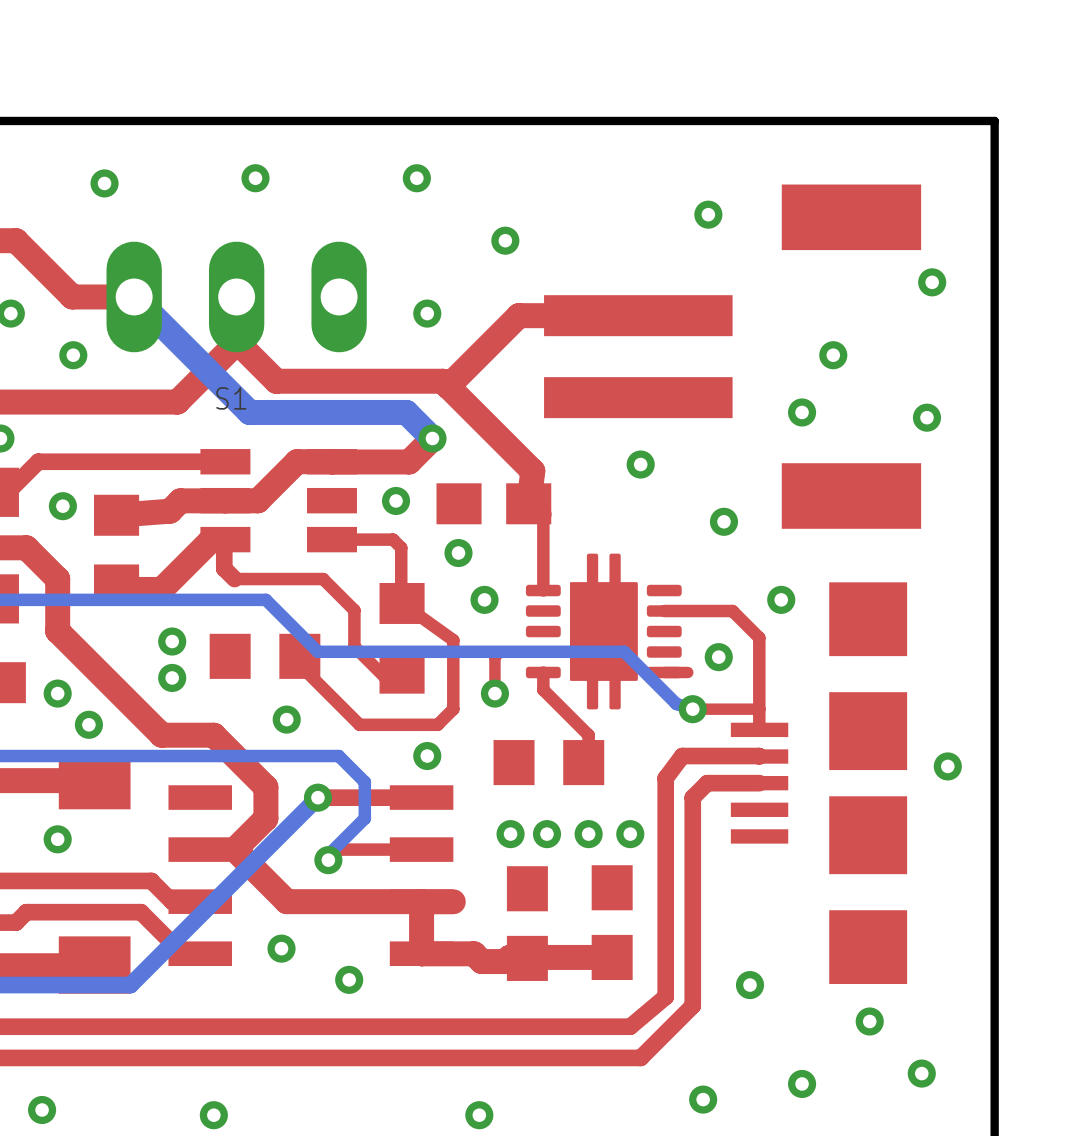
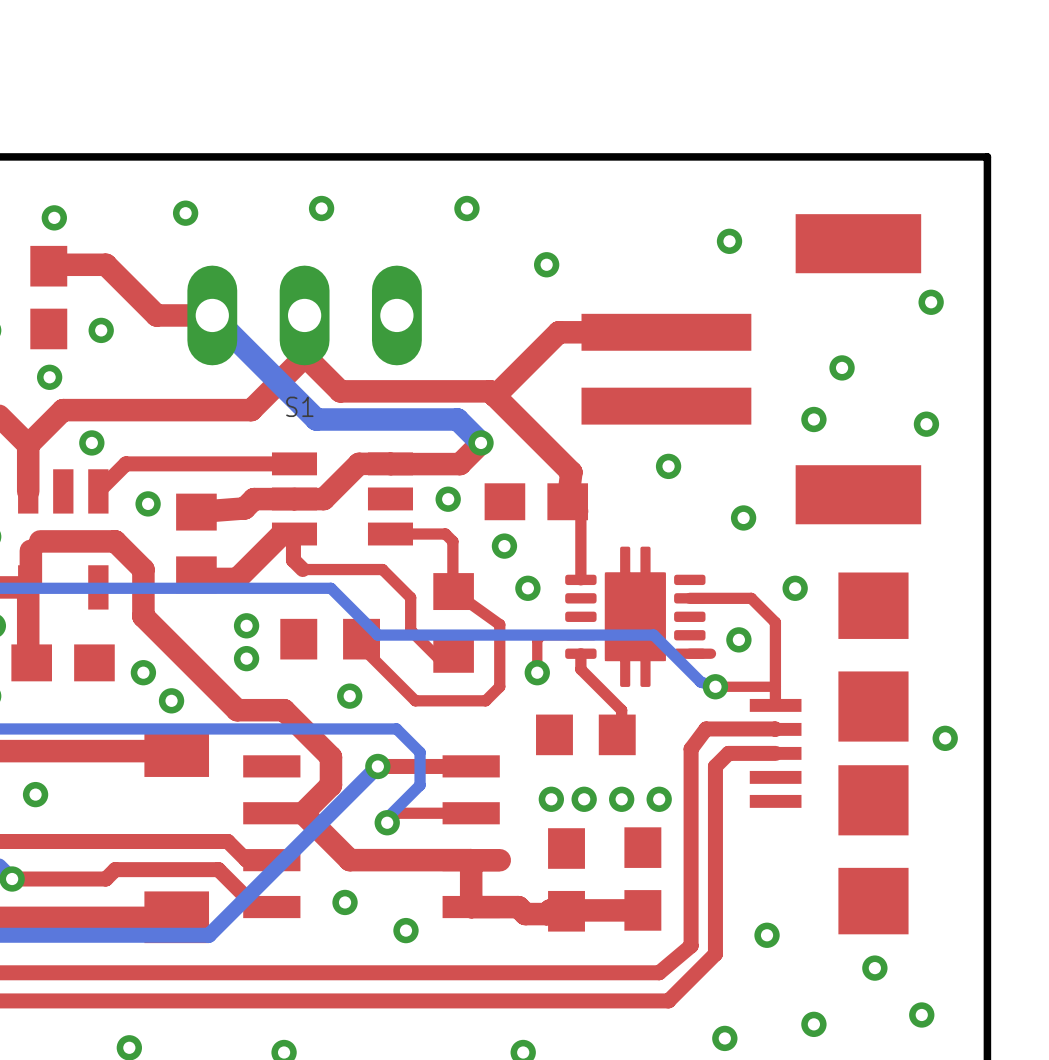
via: (427, 313) -> none
via: (73, 355) -> none
via: (427, 756) -> none
via: (57, 839) -> none

